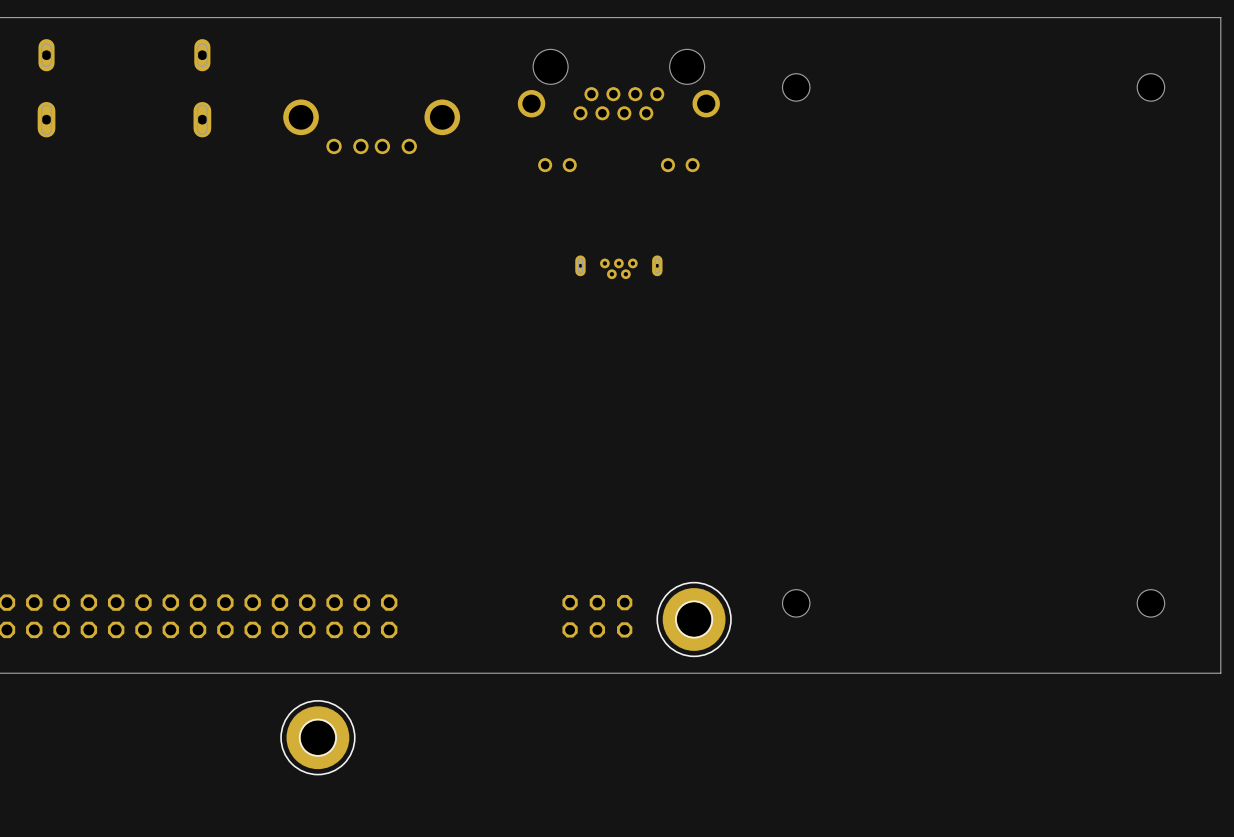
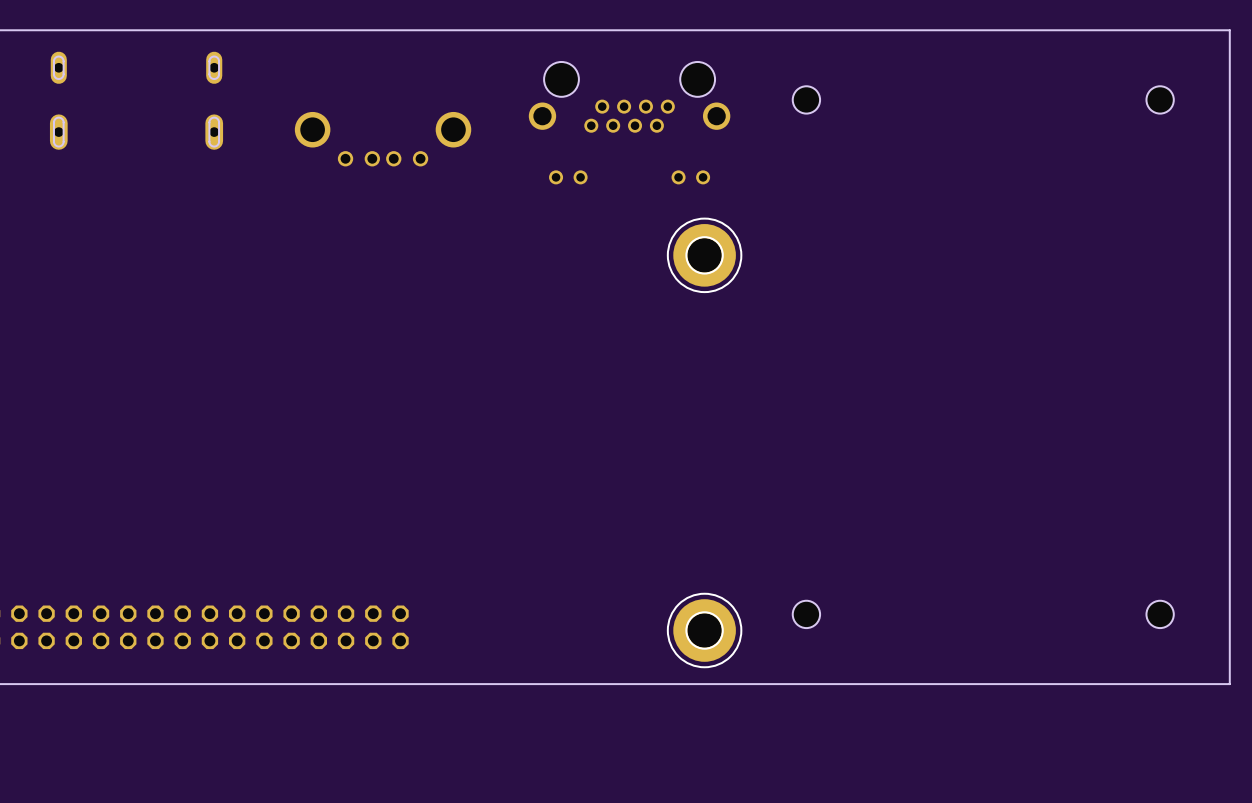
part: none -> (704, 255)
part: (618, 267) -> none
part: (597, 616) -> none
part: (317, 737) -> none

